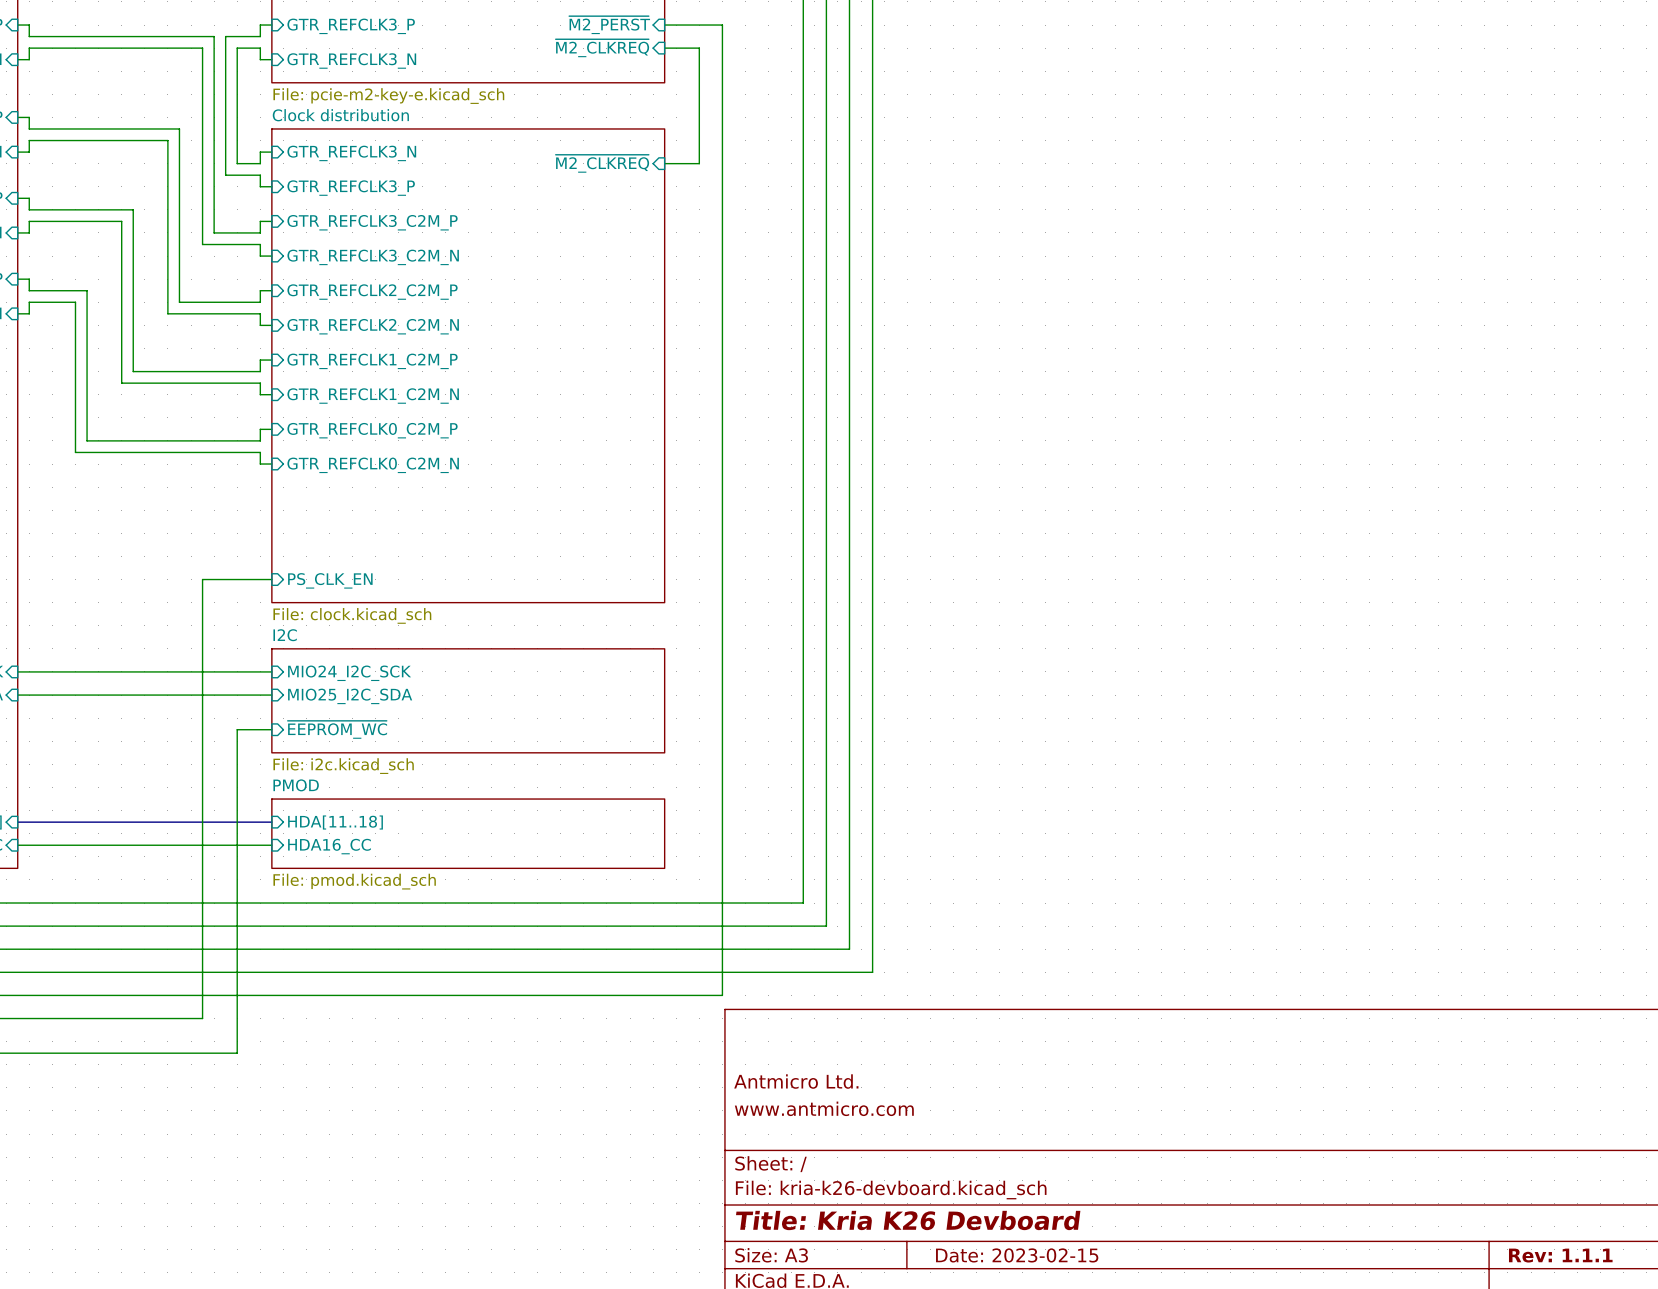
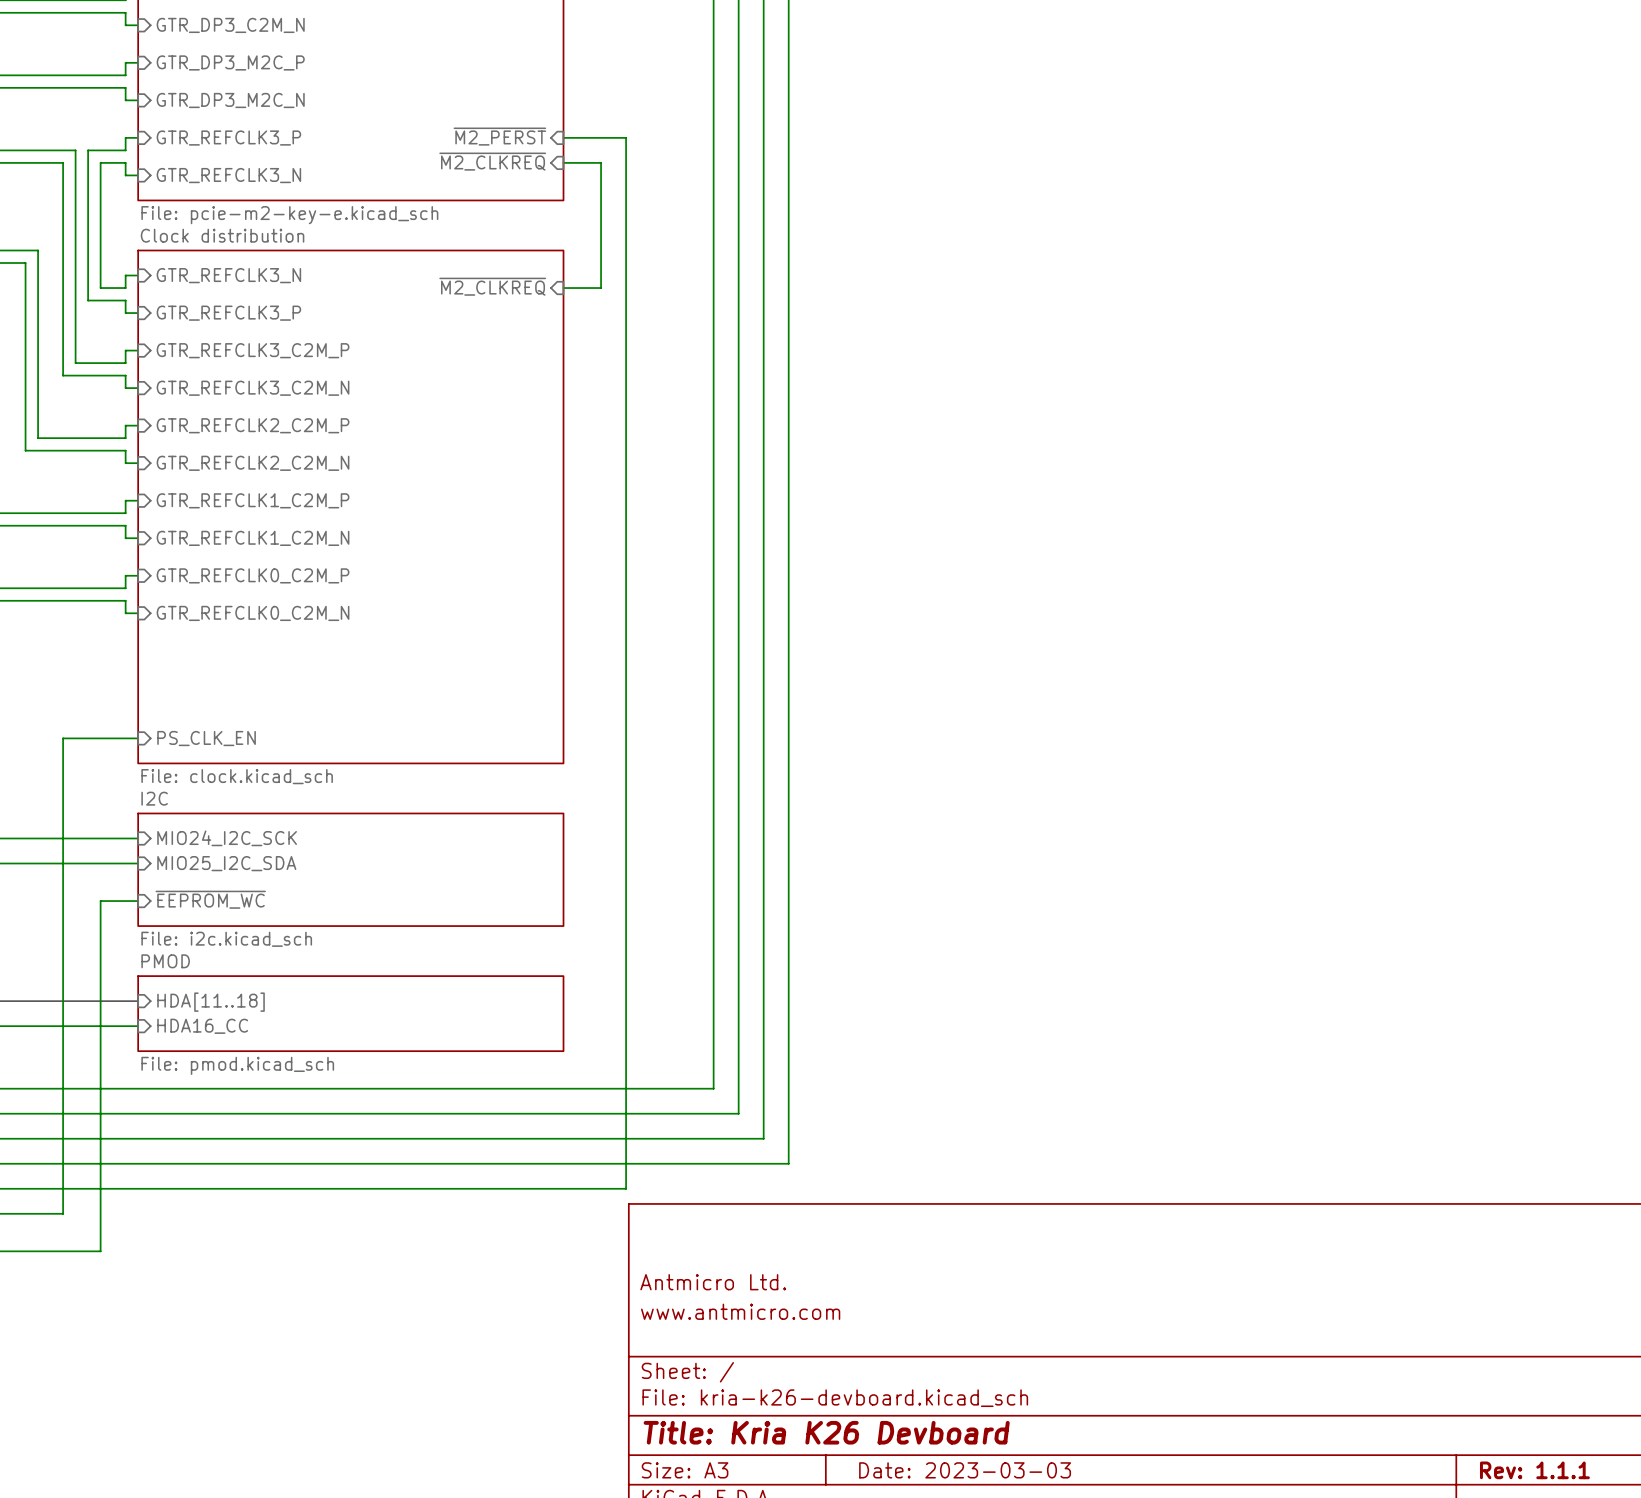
title block: Date: 2023-02-15 (1017, 1255) -> Date: 2023-03-03 (965, 1470)

